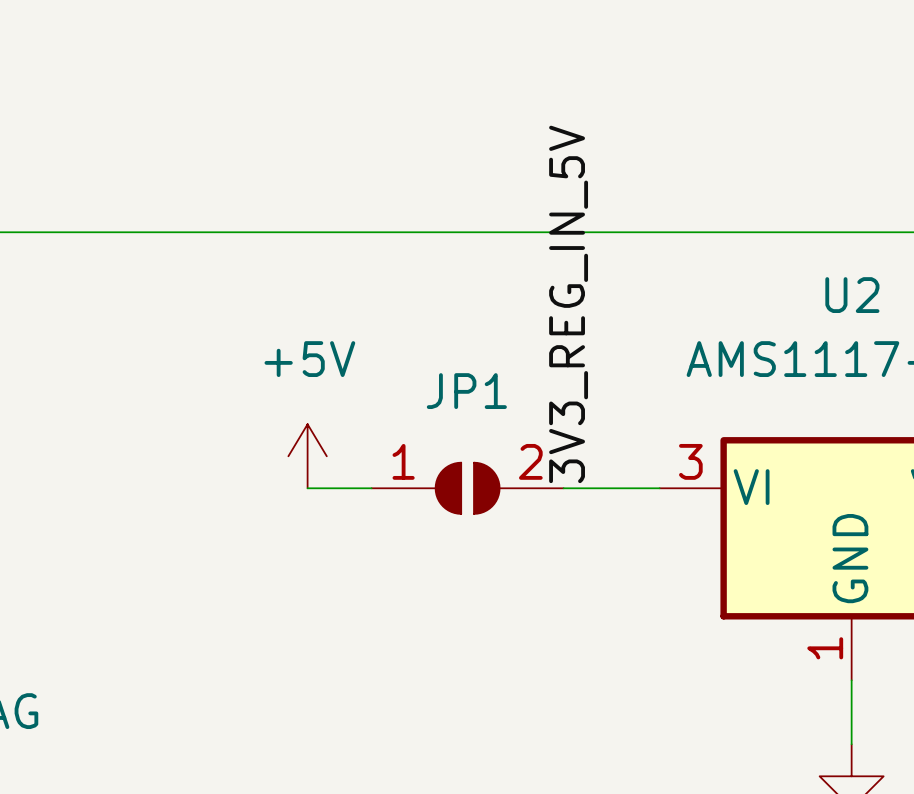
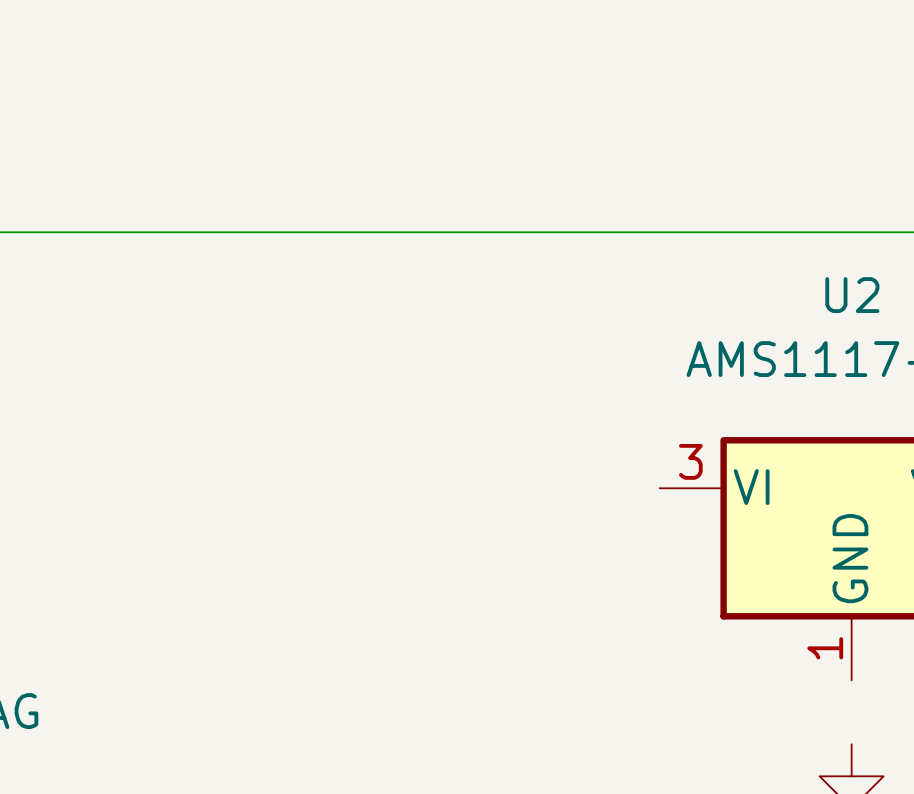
label: 3V3_REG_IN_5V (568, 304) -> none
power symbol: +5V (307, 456) -> none
wire: (307, 488) (371, 488) -> none
JP1: (467, 488) -> none
wire: (563, 488) (659, 488) -> none
wire: (851, 680) (851, 744) -> none

